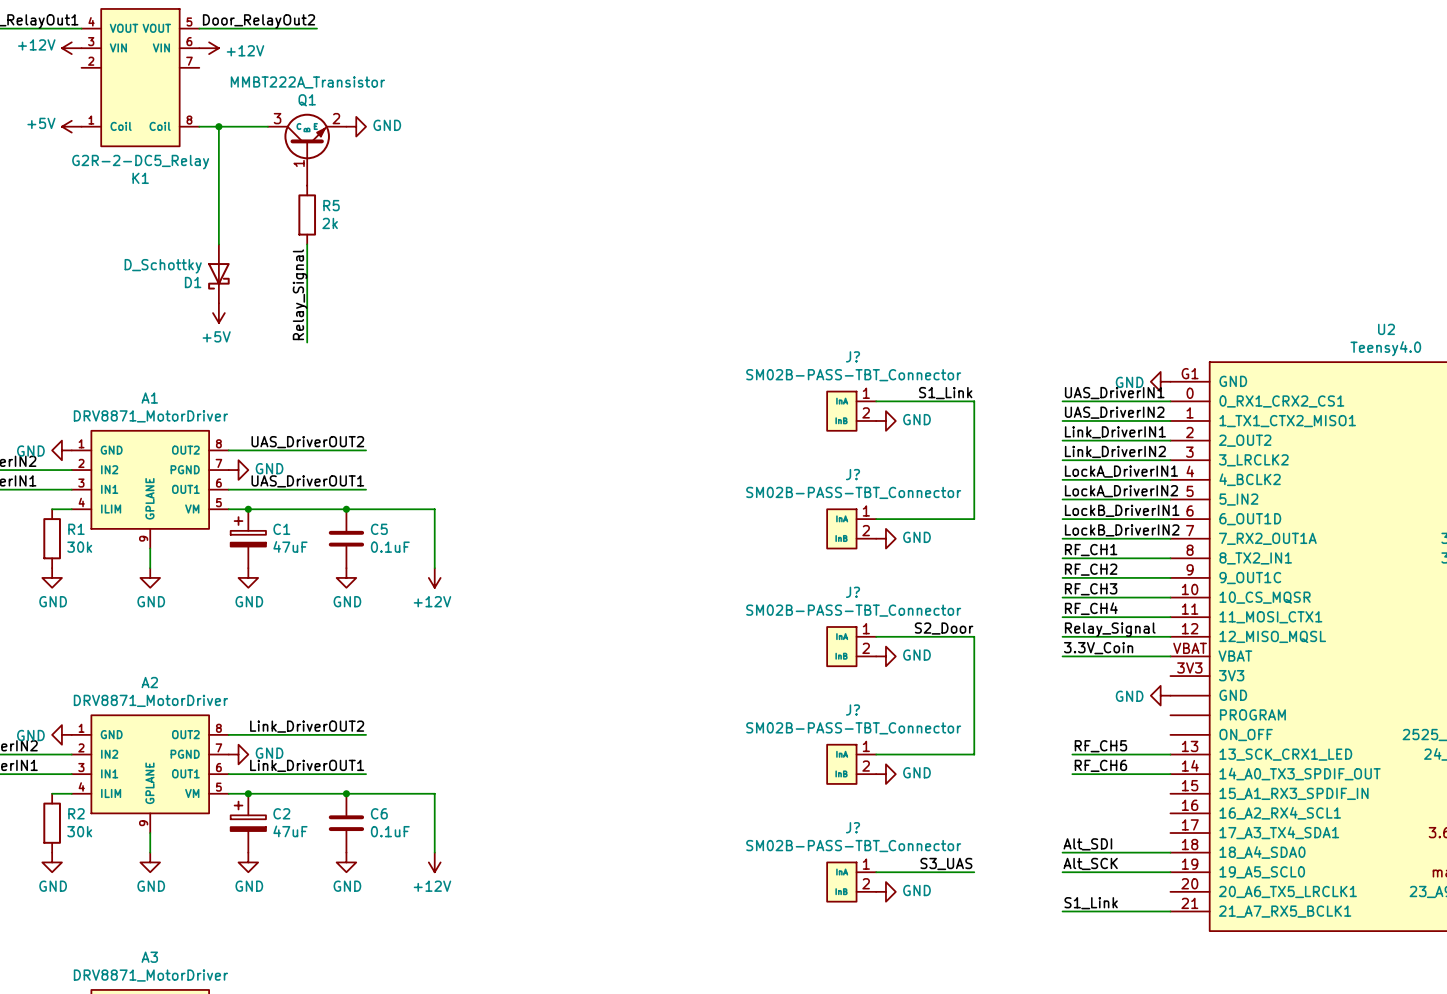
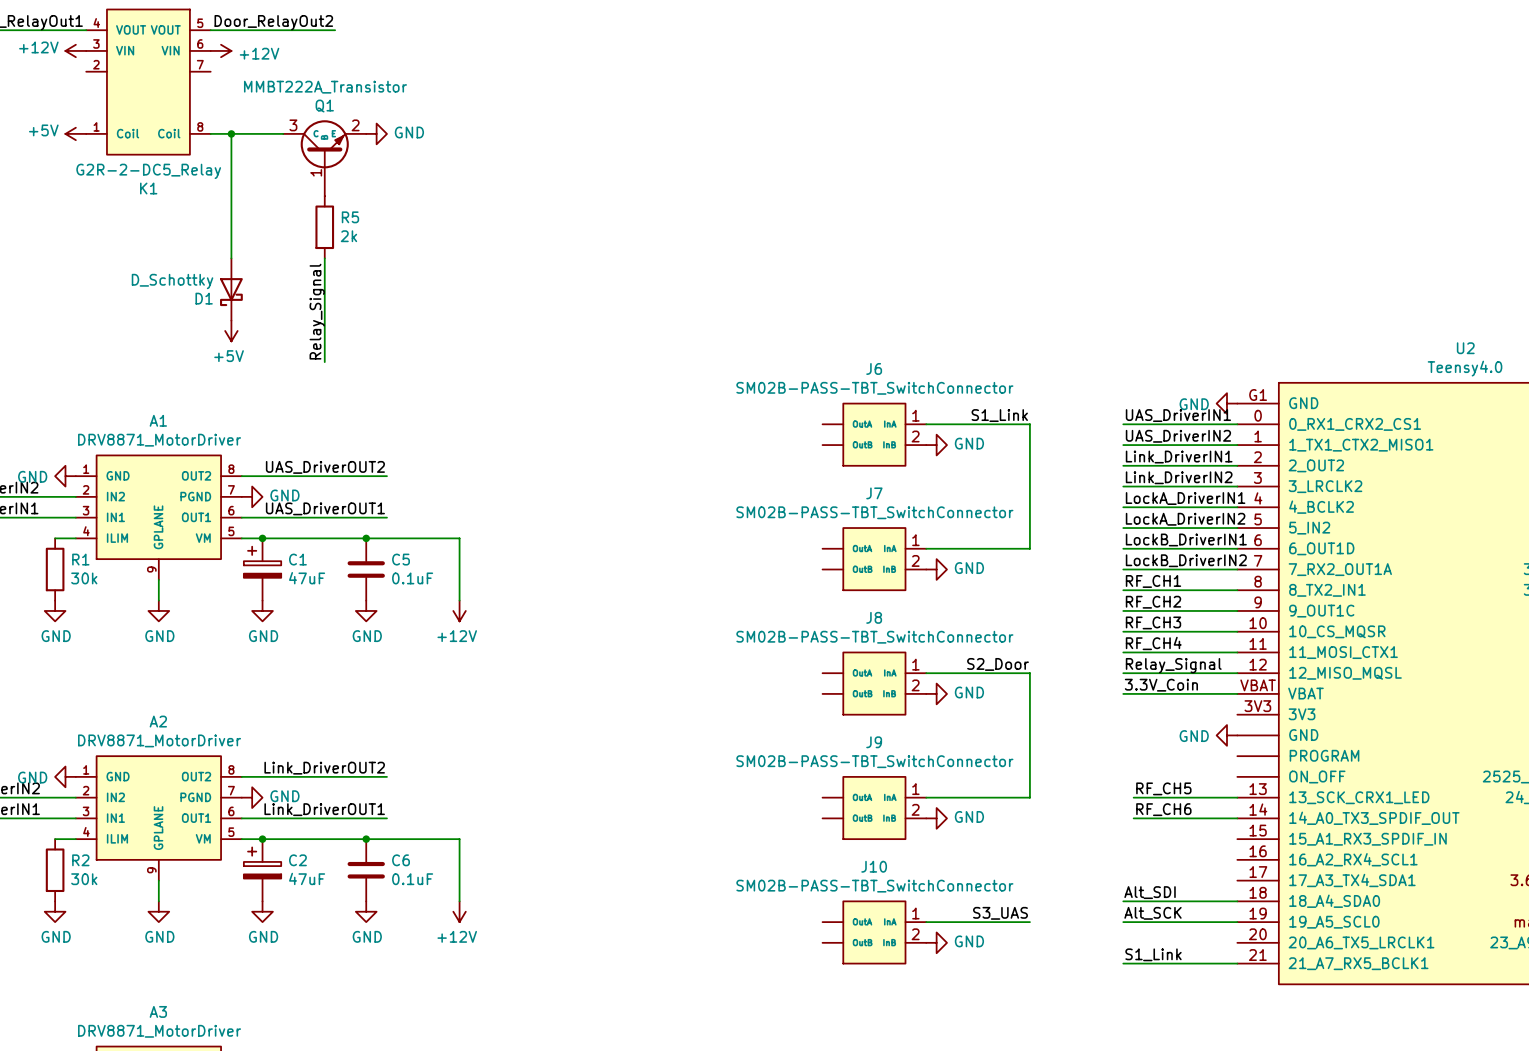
J6: none -> SM02B-PASS-TBT_SwitchConnector (874, 434)
J?: SM02B-PASS-TBT_Connector (851, 411) -> none
J7: none -> SM02B-PASS-TBT_SwitchConnector (874, 559)
J?: SM02B-PASS-TBT_Connector (851, 528) -> none
J8: none -> SM02B-PASS-TBT_SwitchConnector (874, 683)
J?: SM02B-PASS-TBT_Connector (851, 646) -> none
J9: none -> SM02B-PASS-TBT_SwitchConnector (874, 808)
J?: SM02B-PASS-TBT_Connector (851, 764) -> none
J10: none -> SM02B-PASS-TBT_SwitchConnector (874, 932)
J?: SM02B-PASS-TBT_Connector (851, 882) -> none

